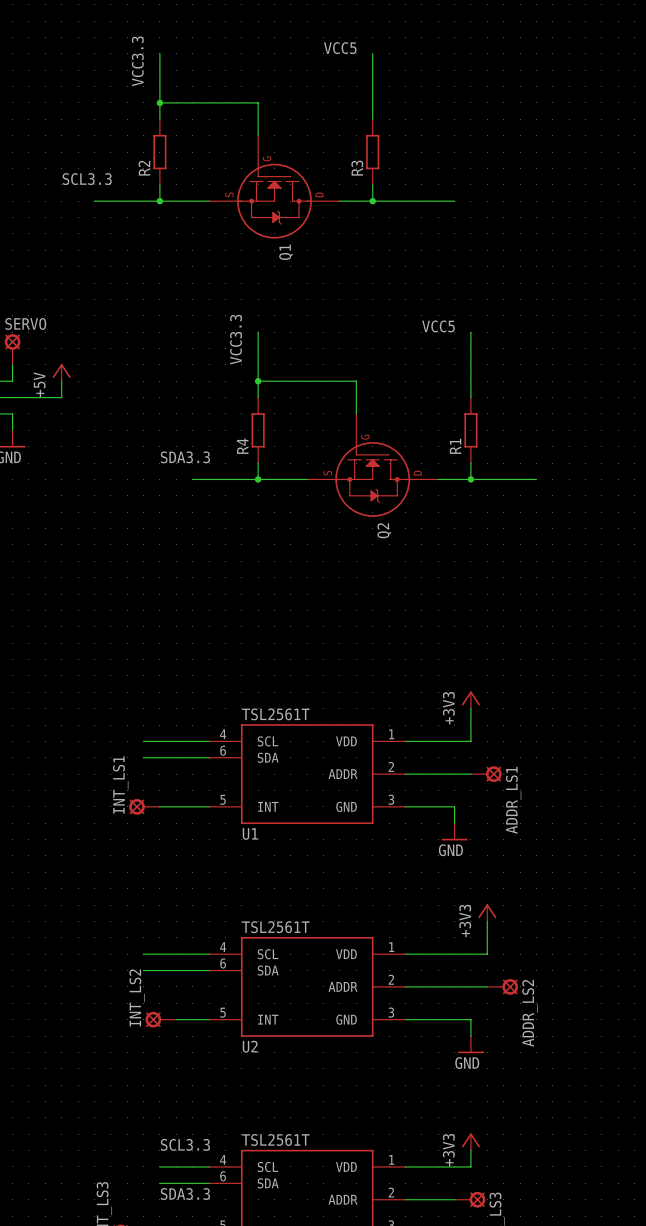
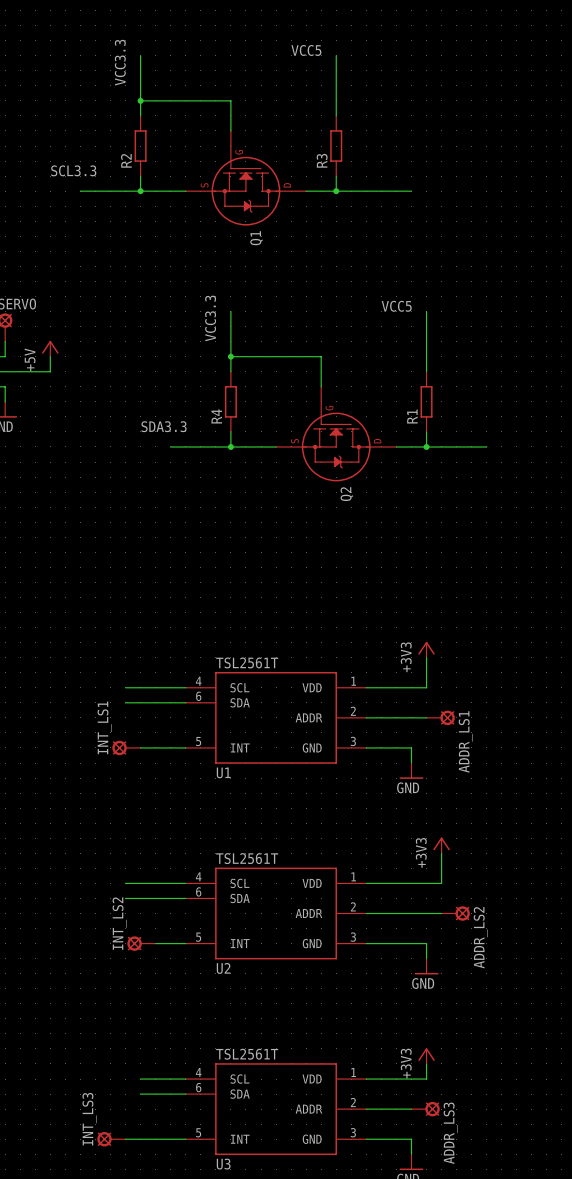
text: SCL3.3 (185, 1144) -> none
text: SDA3.3 (185, 1194) -> none

